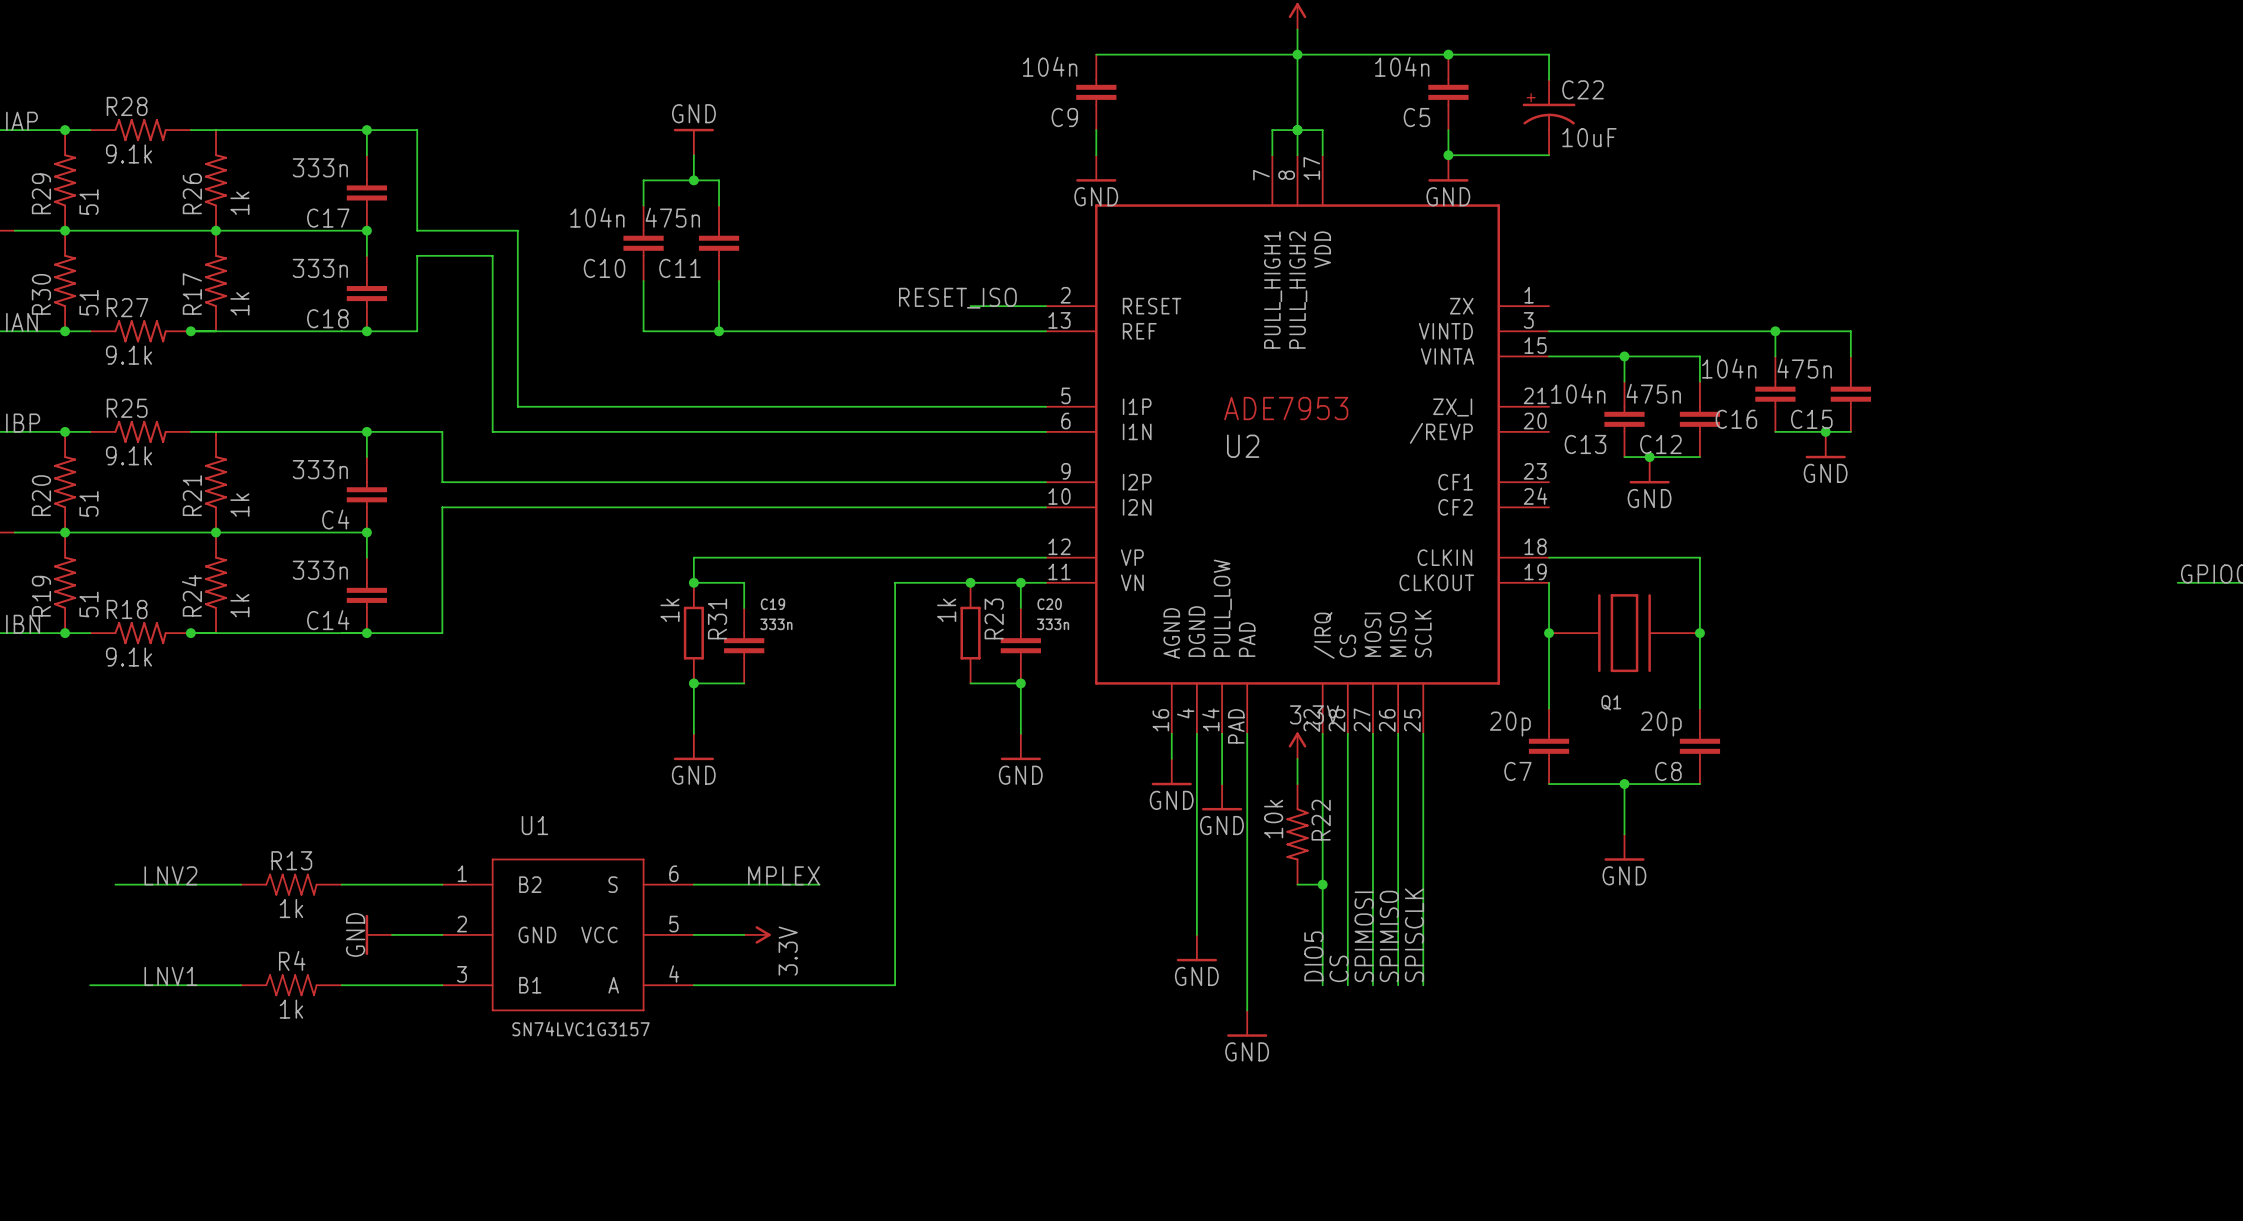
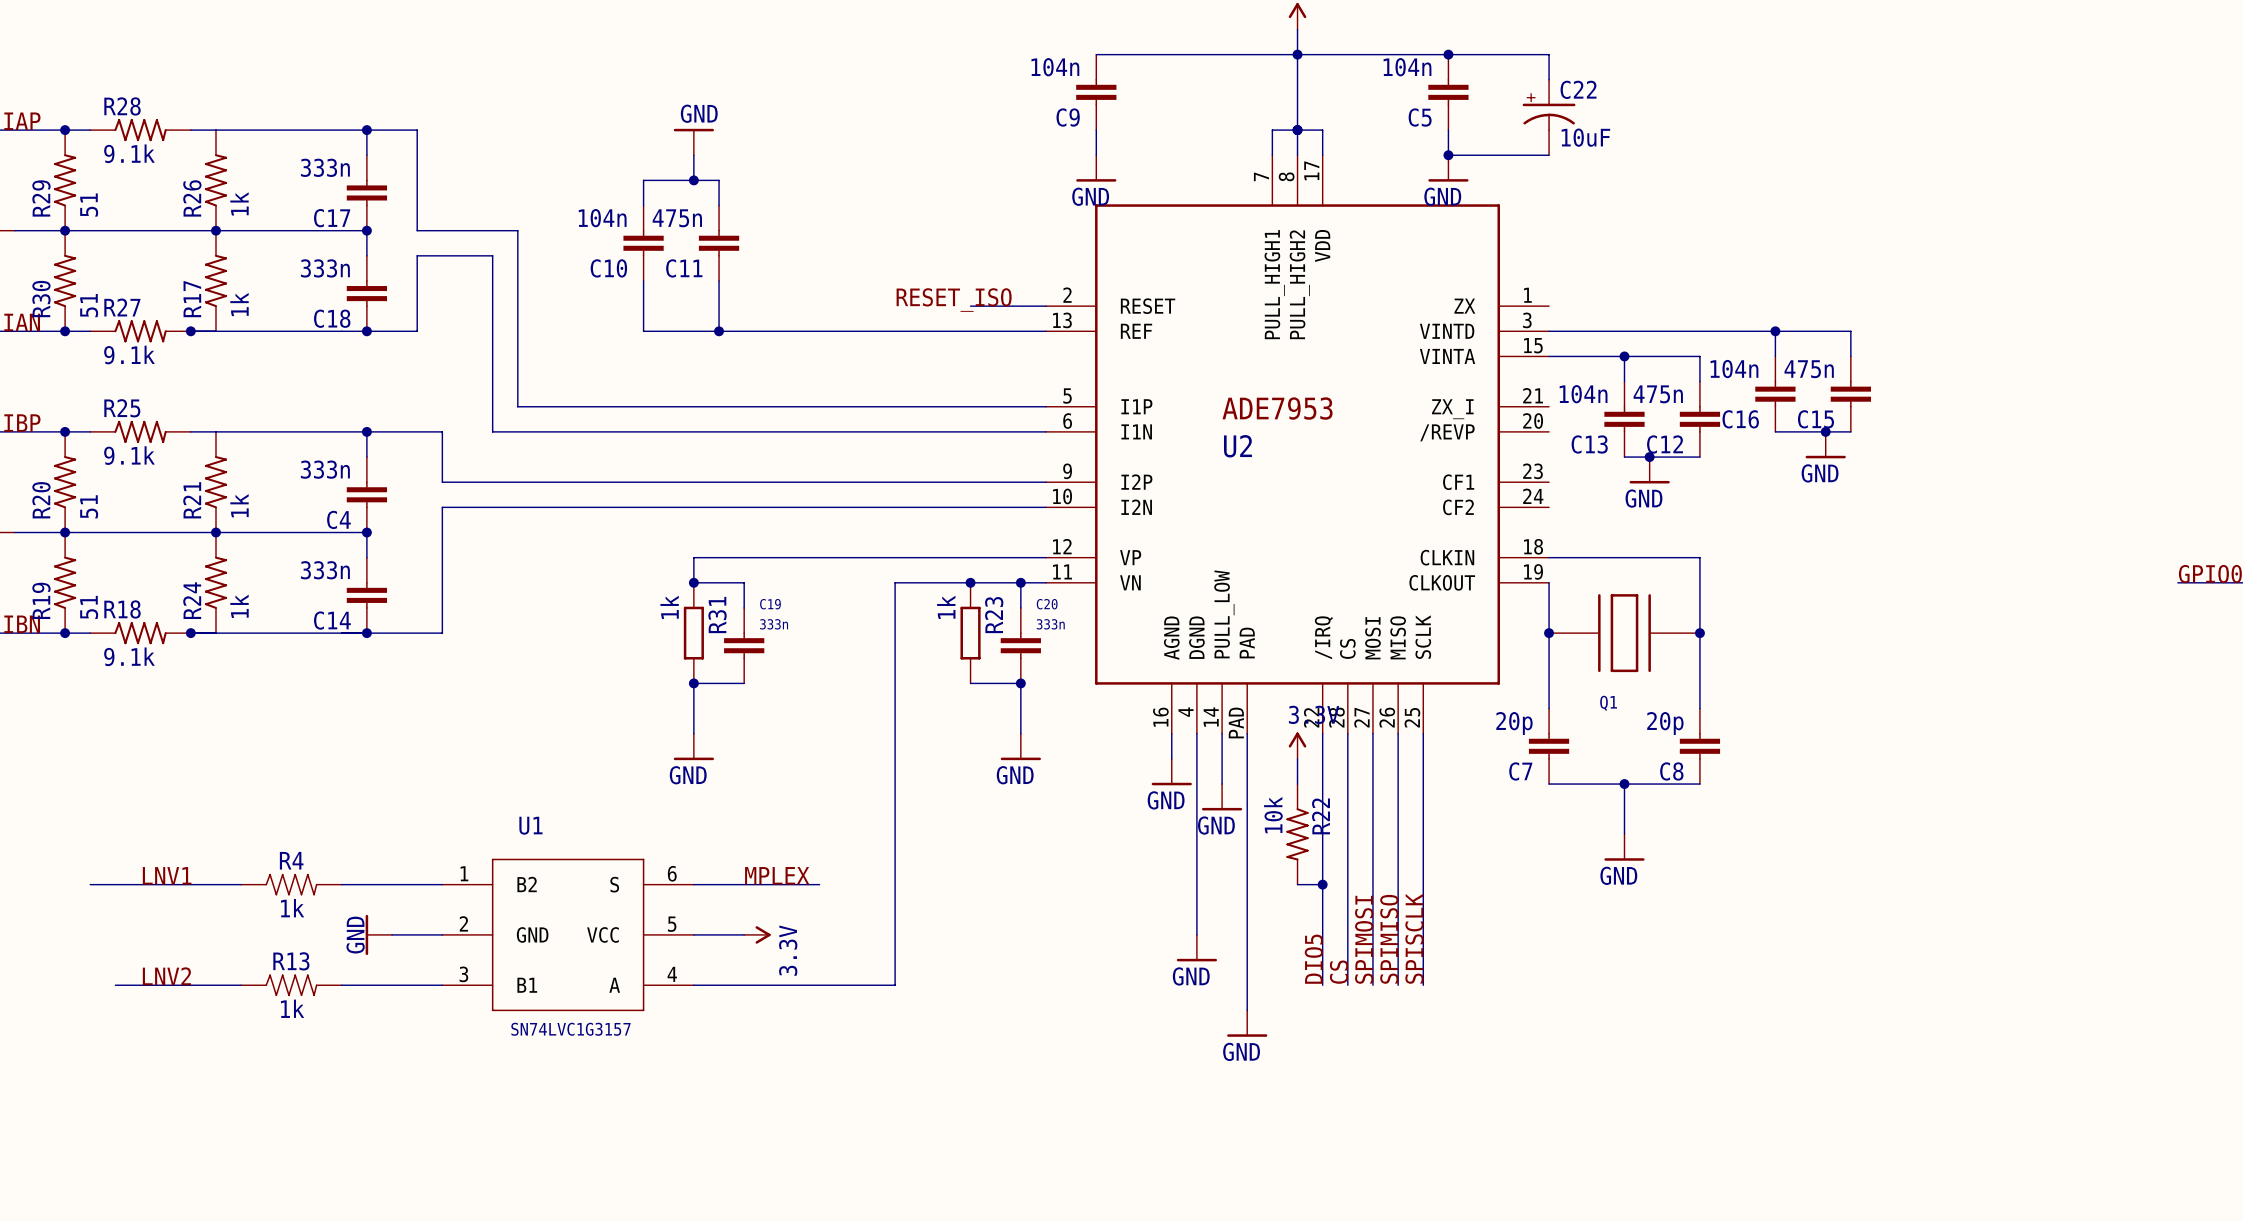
R13 name: R13 (291, 860) -> R4 (291, 860)
label: LNV2 (170, 875) -> LNV1 (167, 875)
R4 name: R4 (292, 960) -> R13 (291, 961)
label: LNV1 (170, 976) -> LNV2 (166, 976)
wire: (90, 985) (115, 985) -> (90, 884) (115, 884)

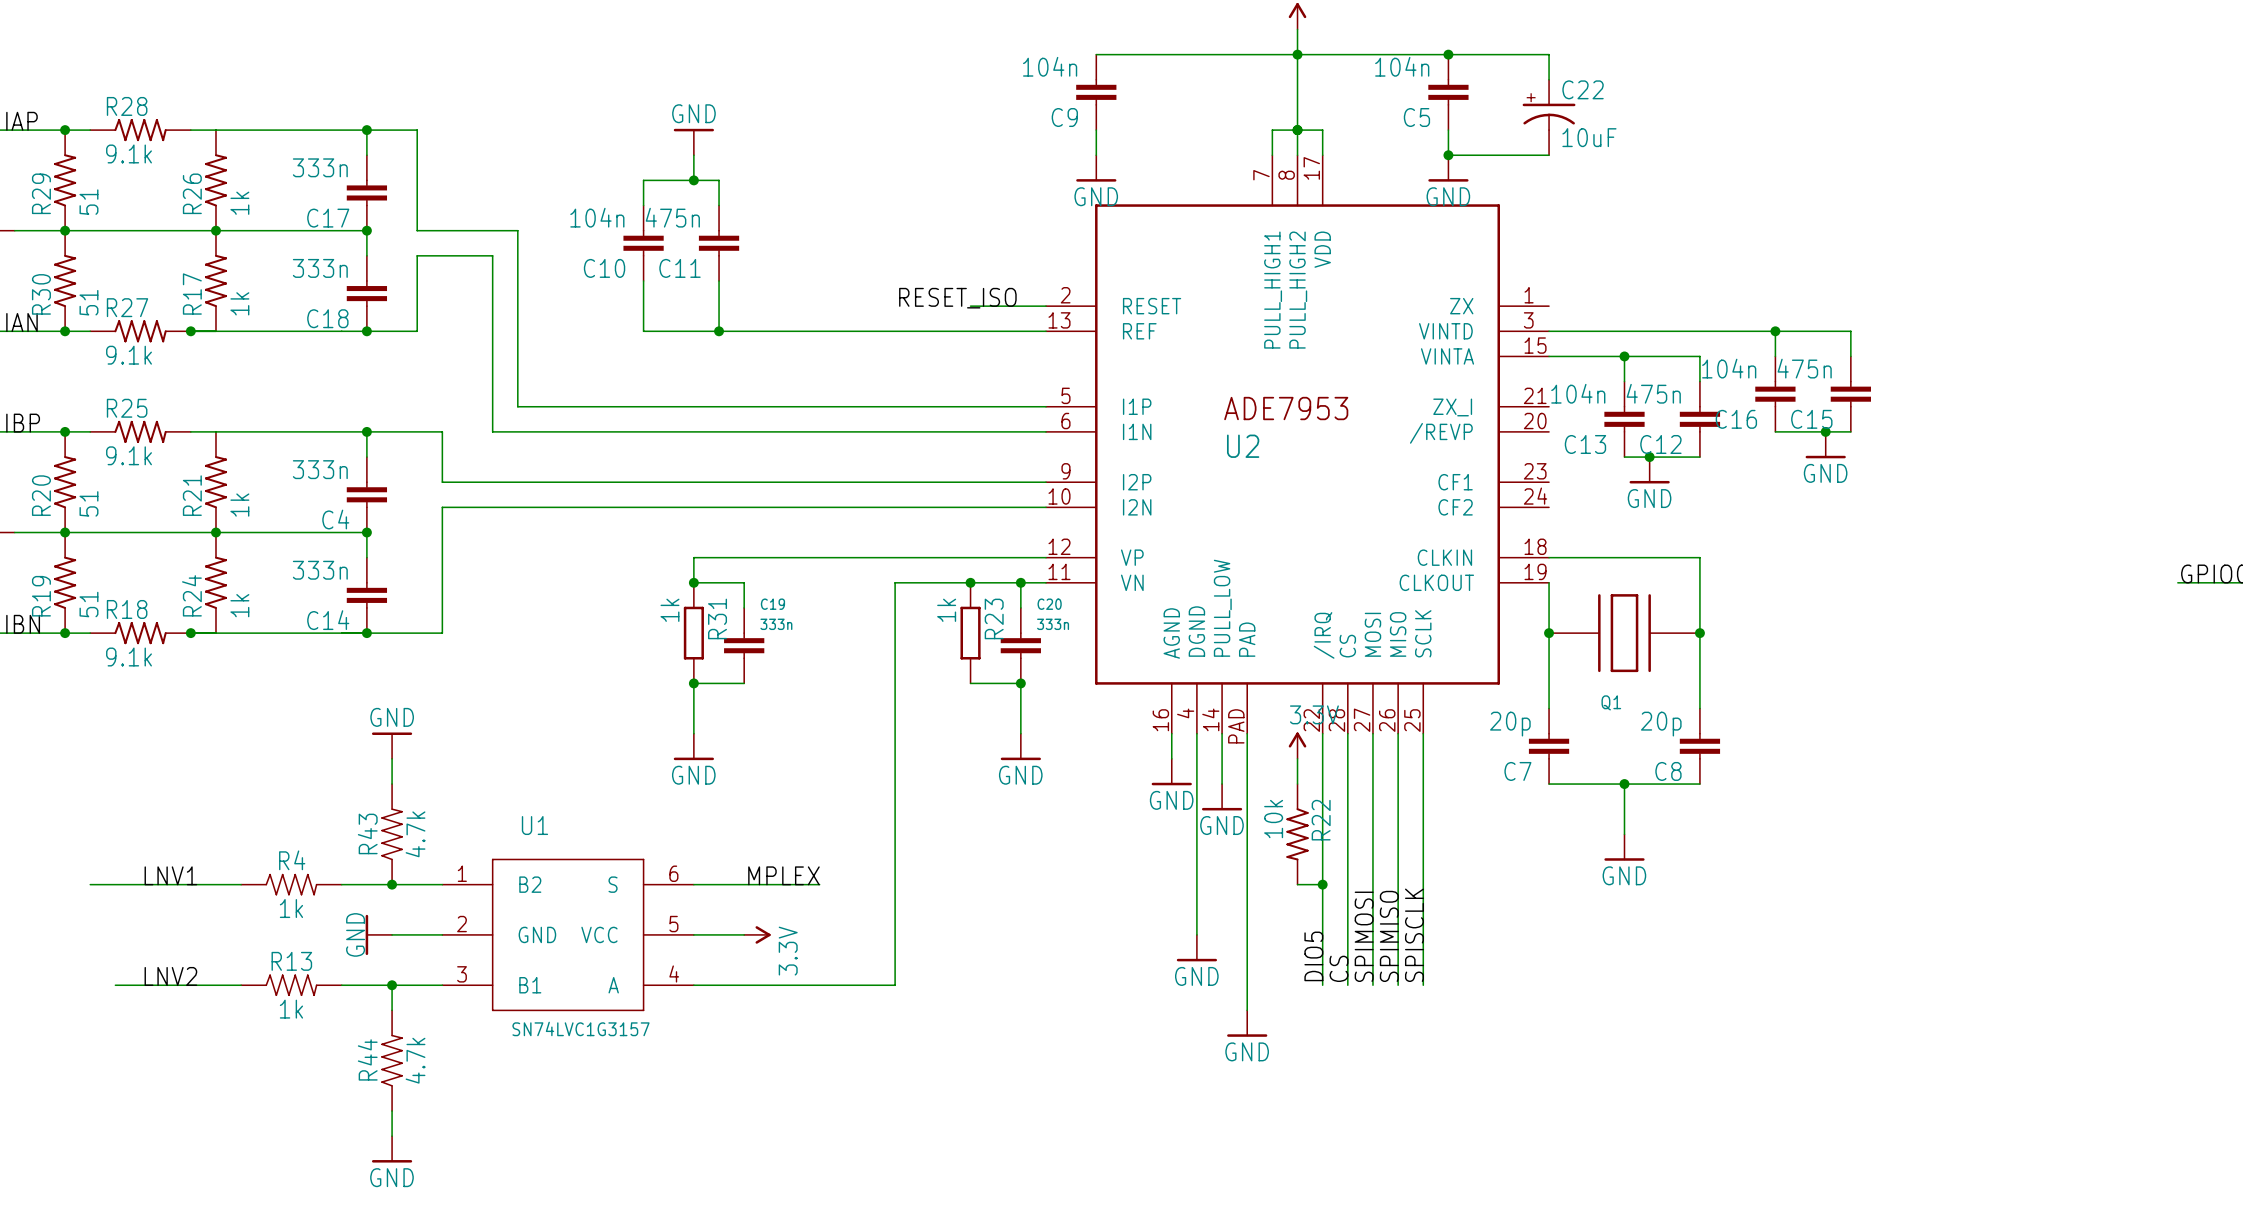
power symbol: none -> GND (392, 745)
wire: none -> (392, 758) (392, 784)
R43: none -> 4.7k (392, 834)
junction: none -> (392, 884)
wire: none -> (392, 985) (392, 1010)
junction: none -> (392, 985)
R44: none -> 4.7k (392, 1060)
wire: none -> (392, 1111) (392, 1136)
power symbol: none -> GND (392, 1149)

